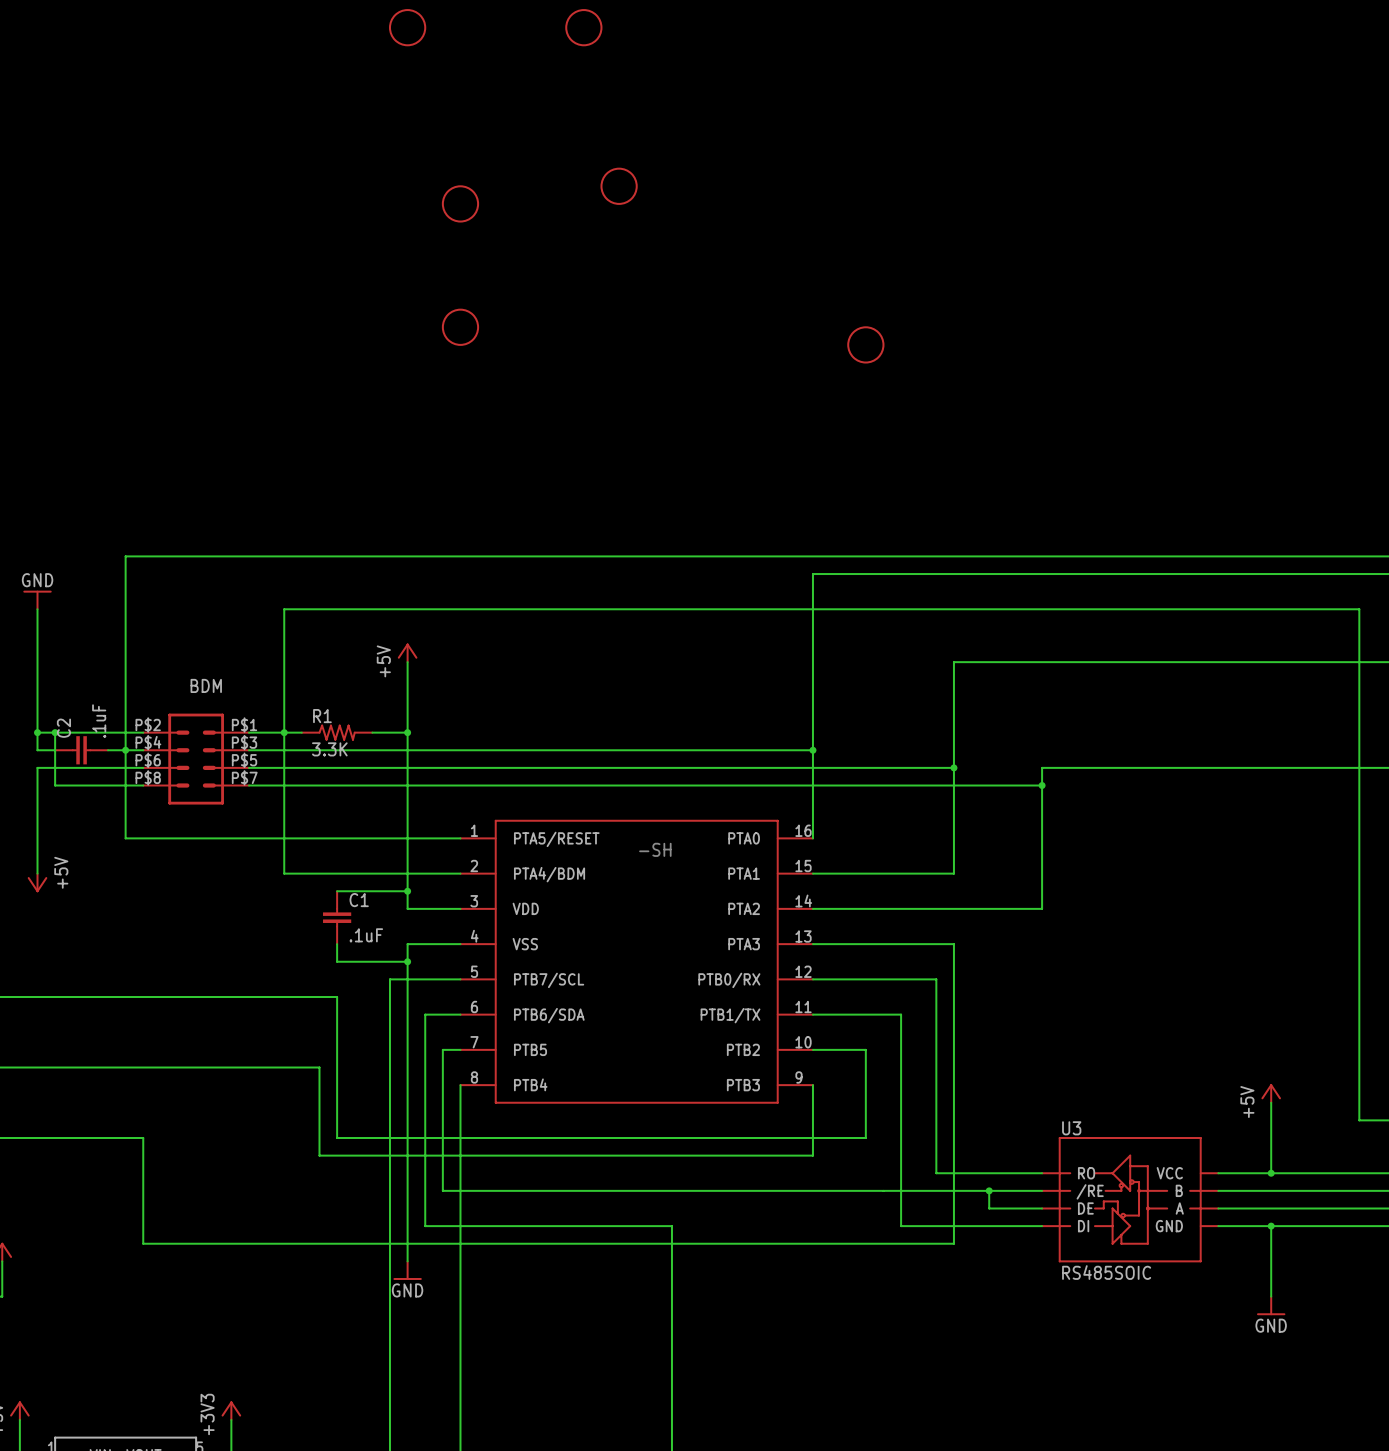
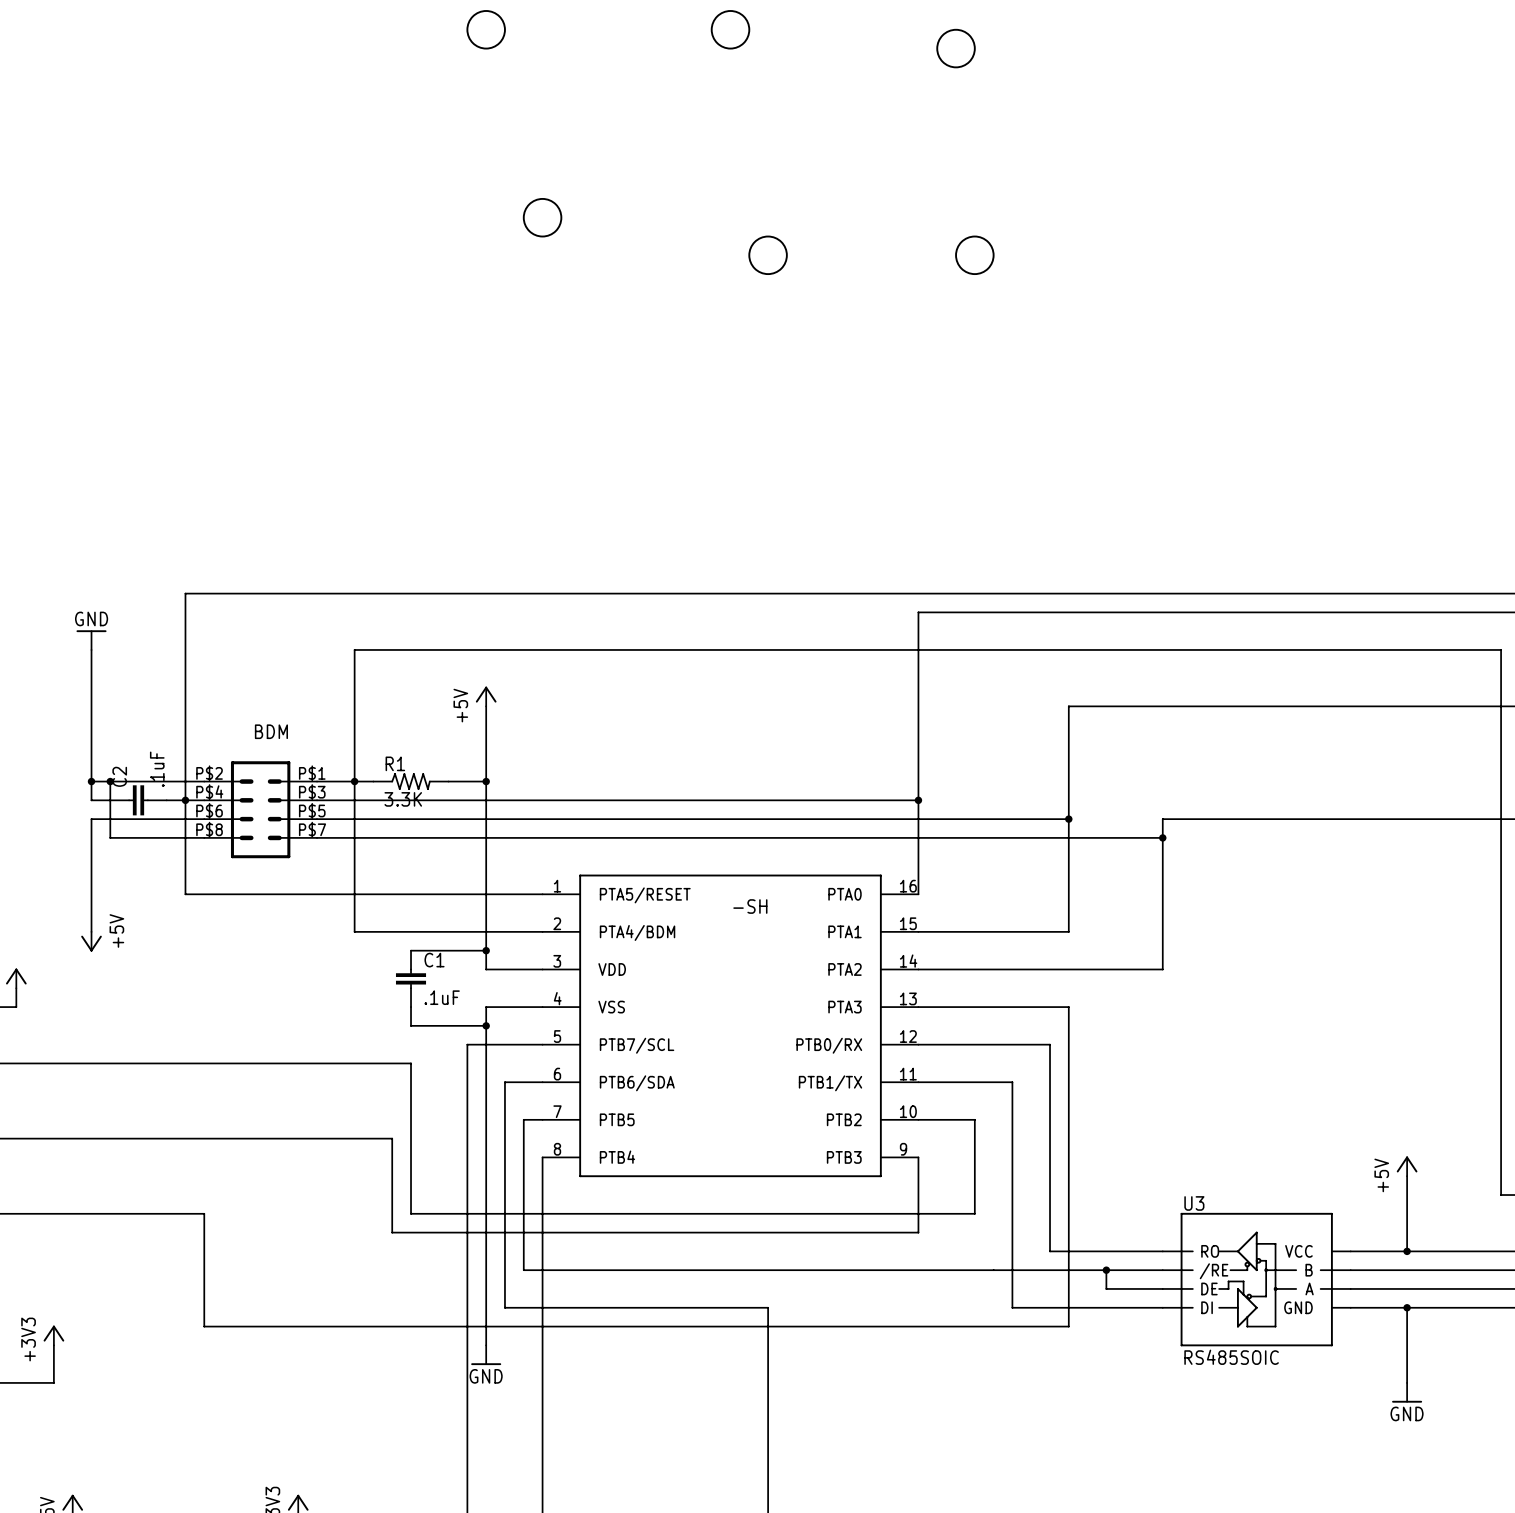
part position: (583, 27) -> (730, 29)
part: none -> (956, 48)
part position: (619, 186) -> (768, 255)
part: (460, 327) -> none
part position: (865, 344) -> (974, 255)

